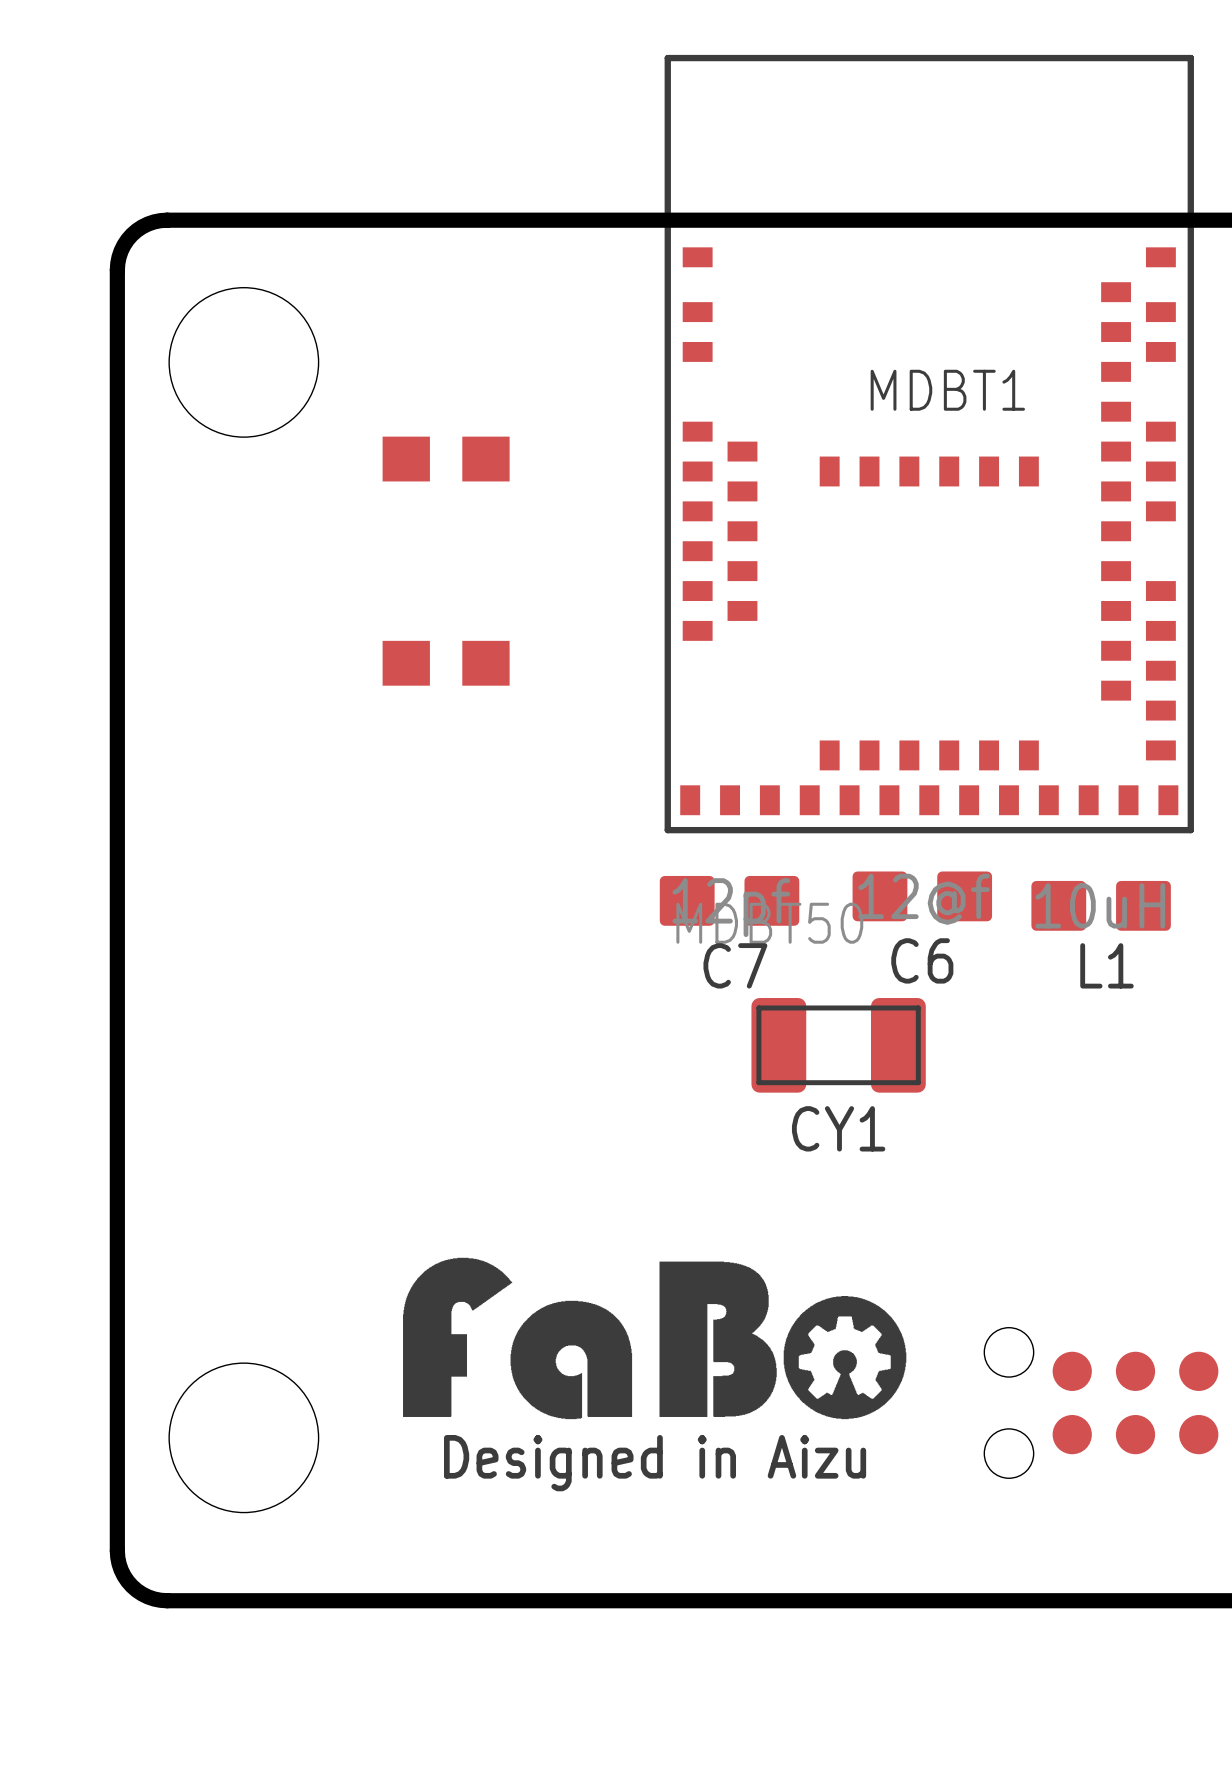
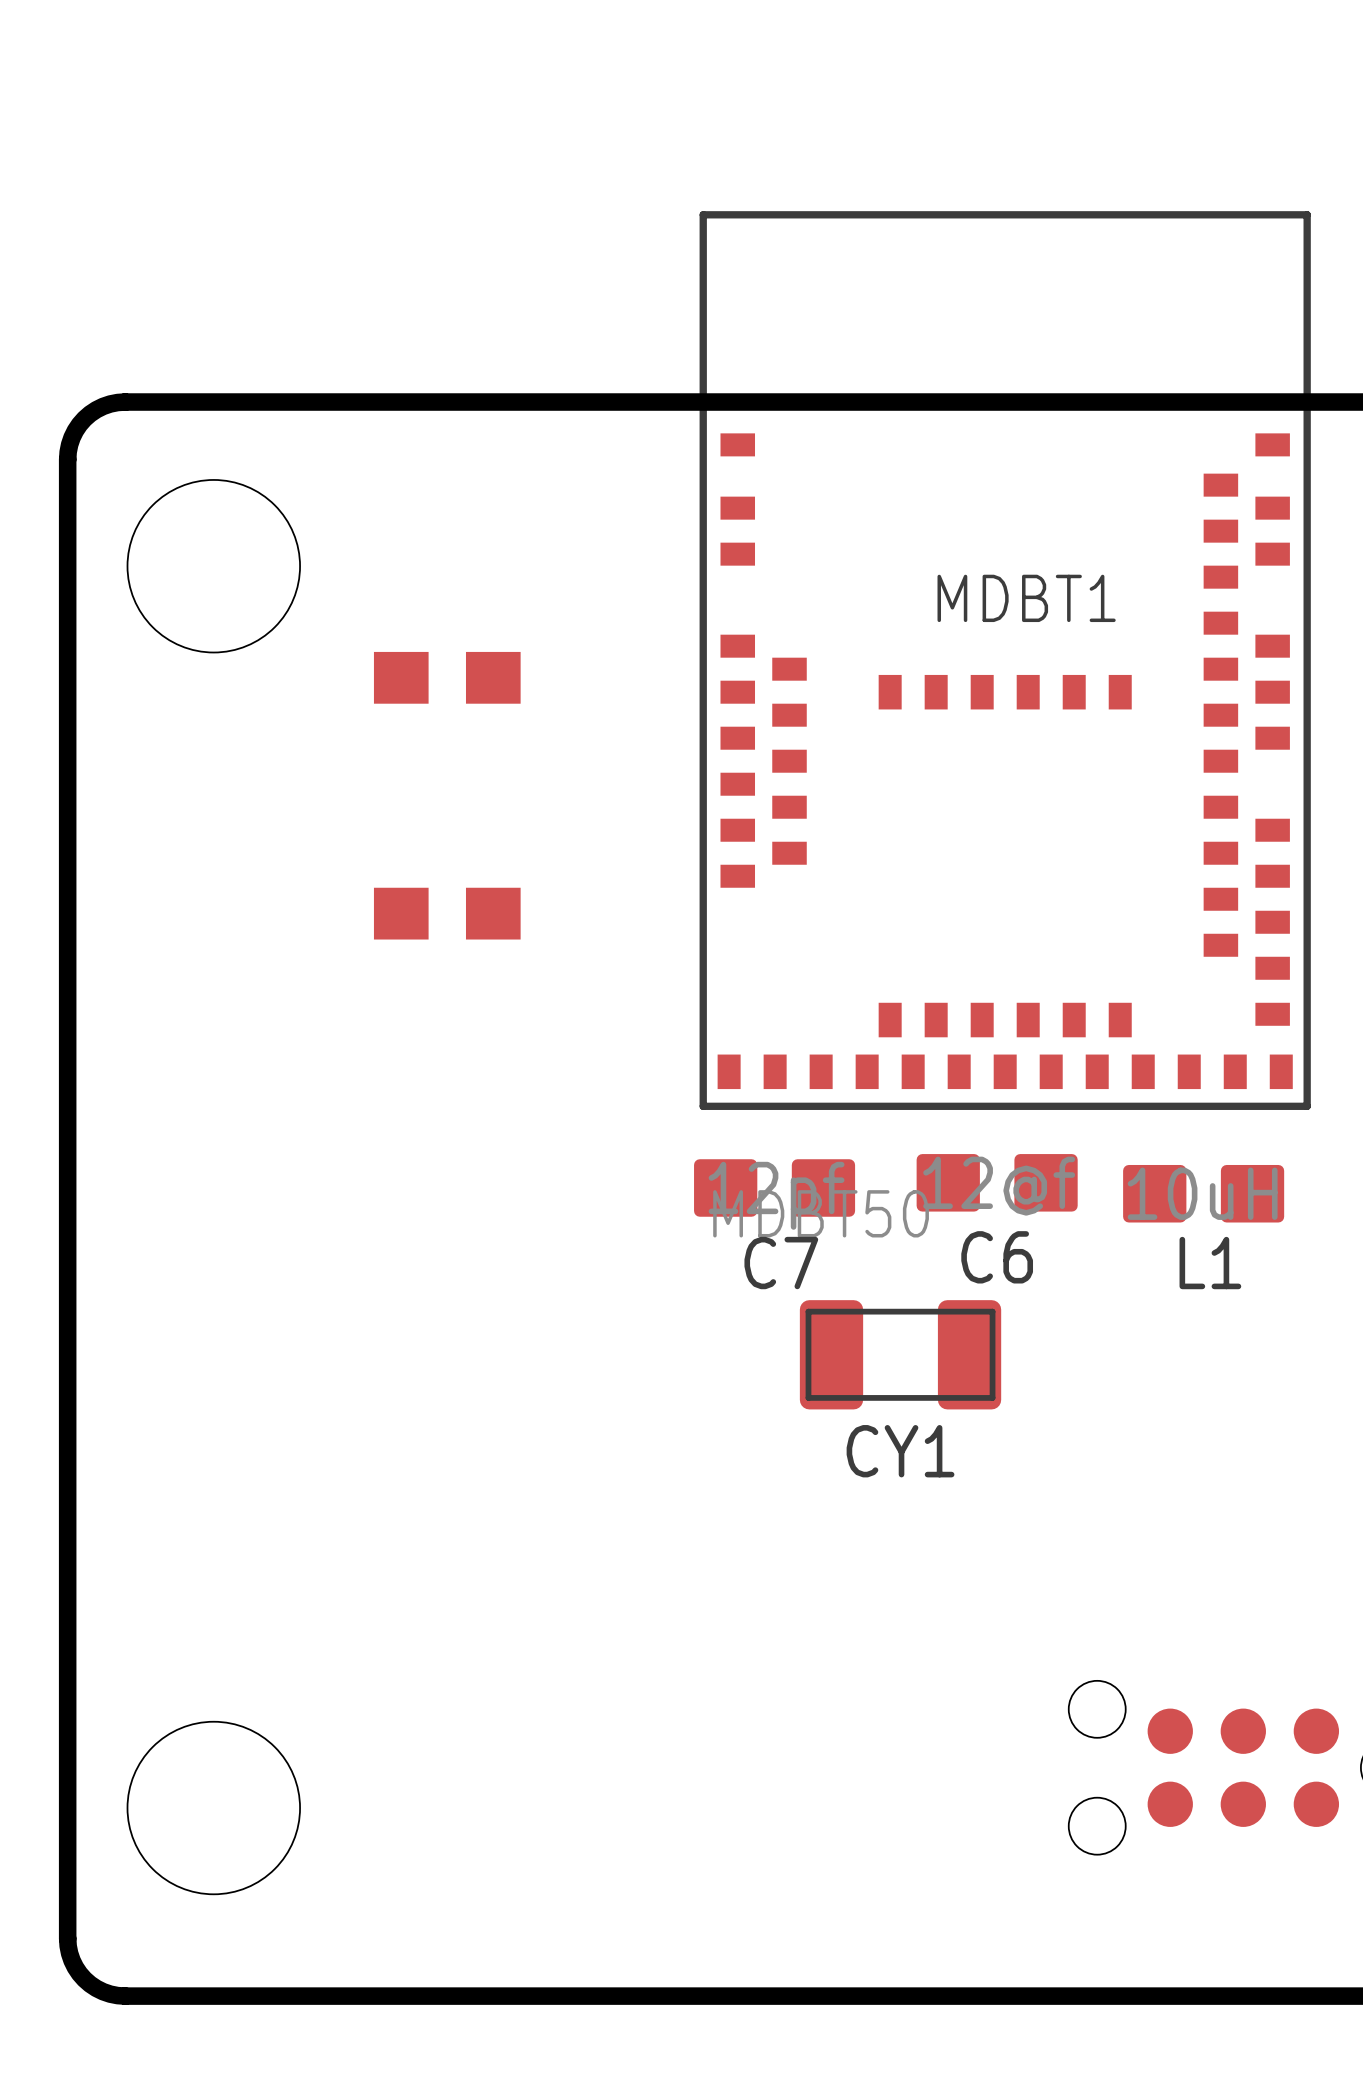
drawing: [403, 1257, 907, 1420] -> none
text: Designed in Aizu (655, 1463) -> none

